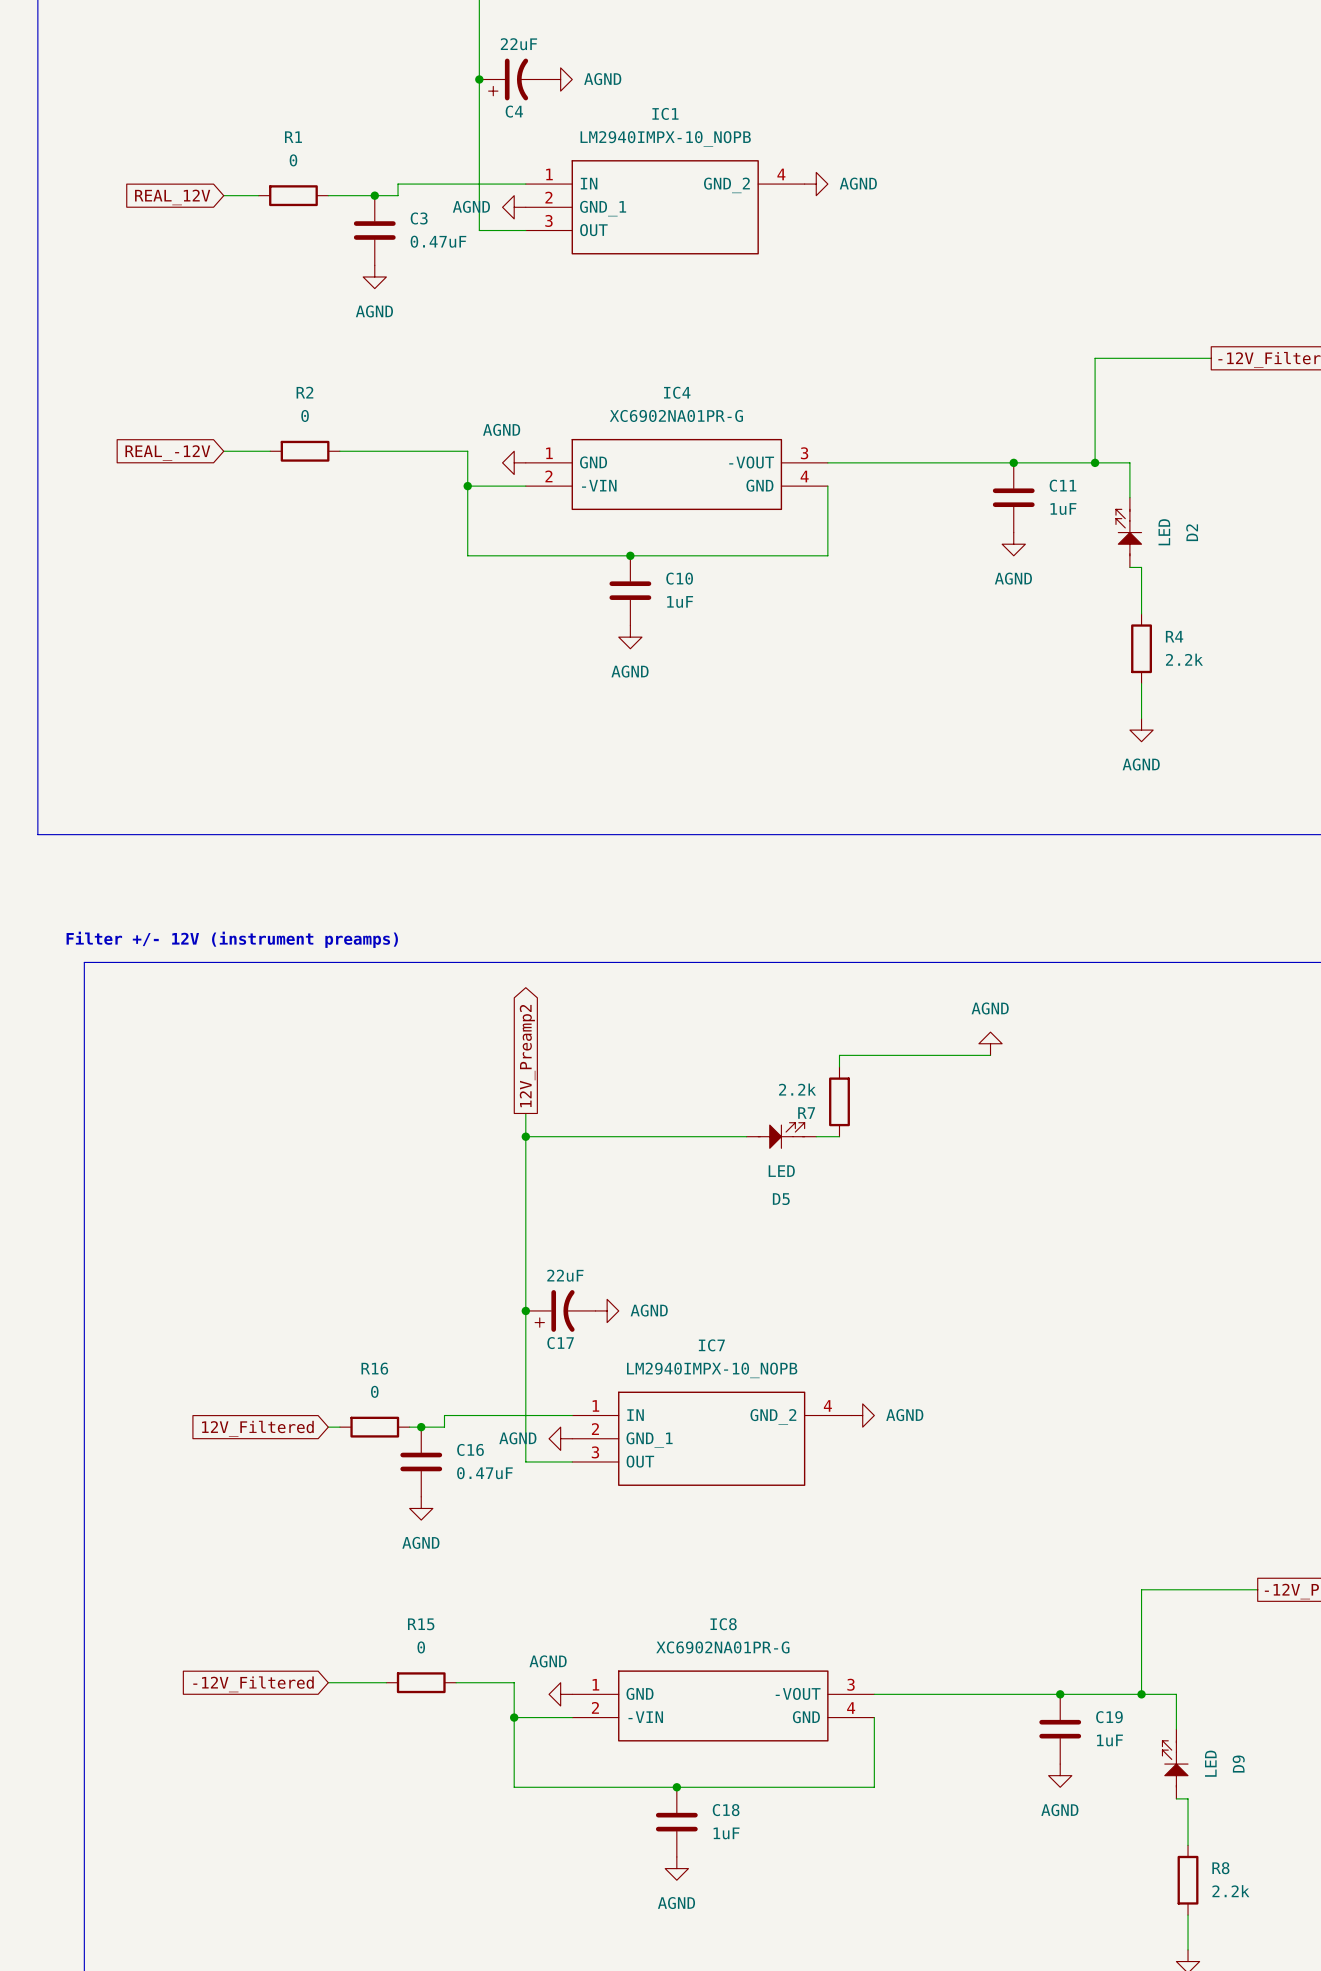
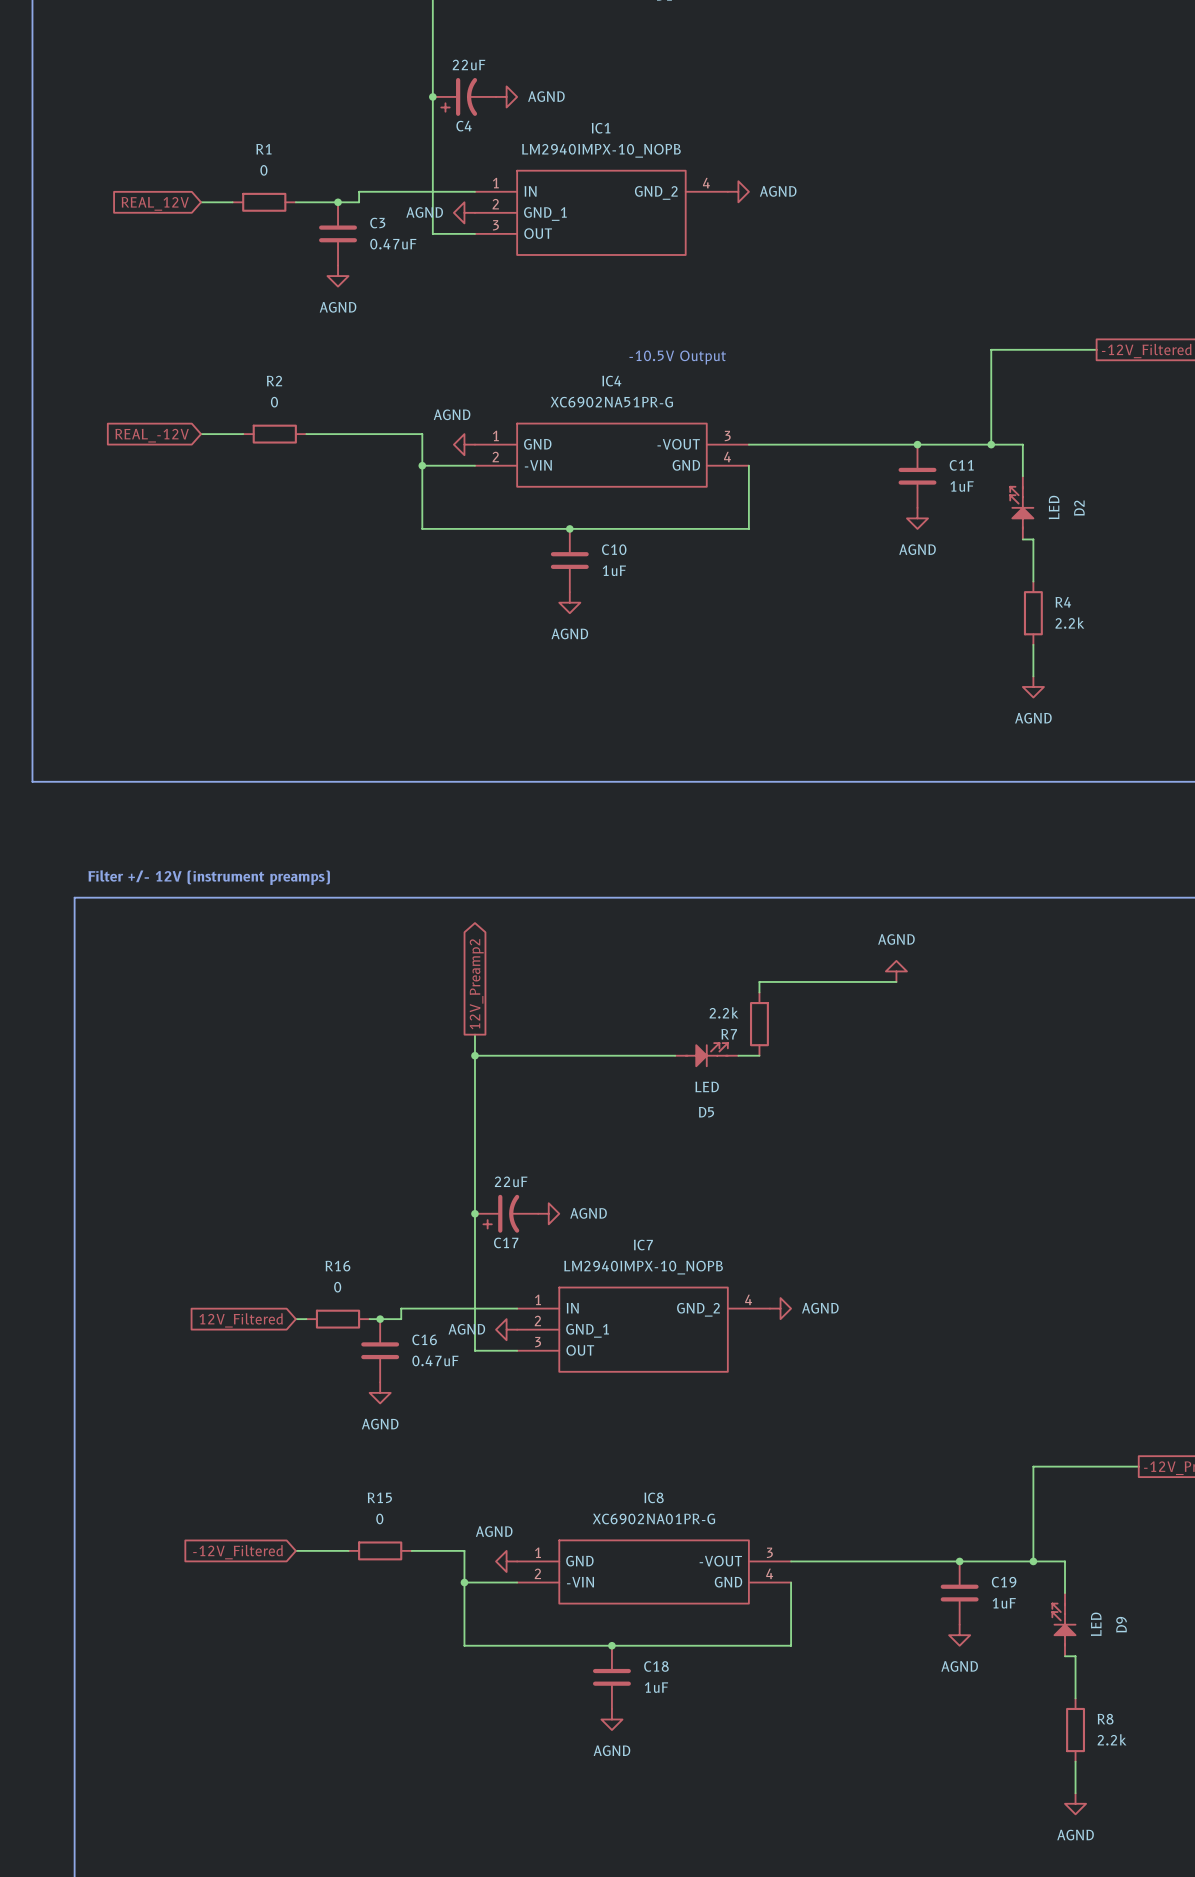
text: none -> -10.5V Output (677, 357)
IC4 value: XC6902NA01PR-G (676, 415) -> XC6902NA51PR-G (611, 402)

